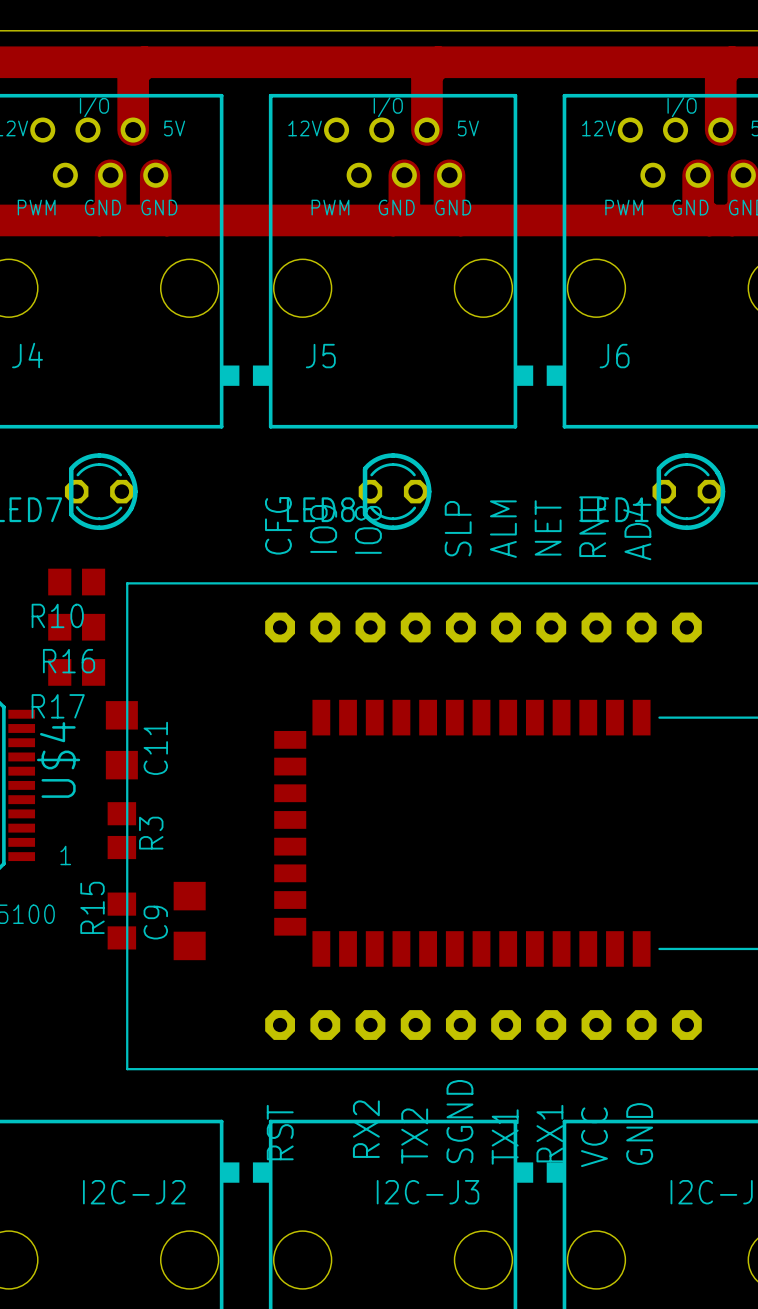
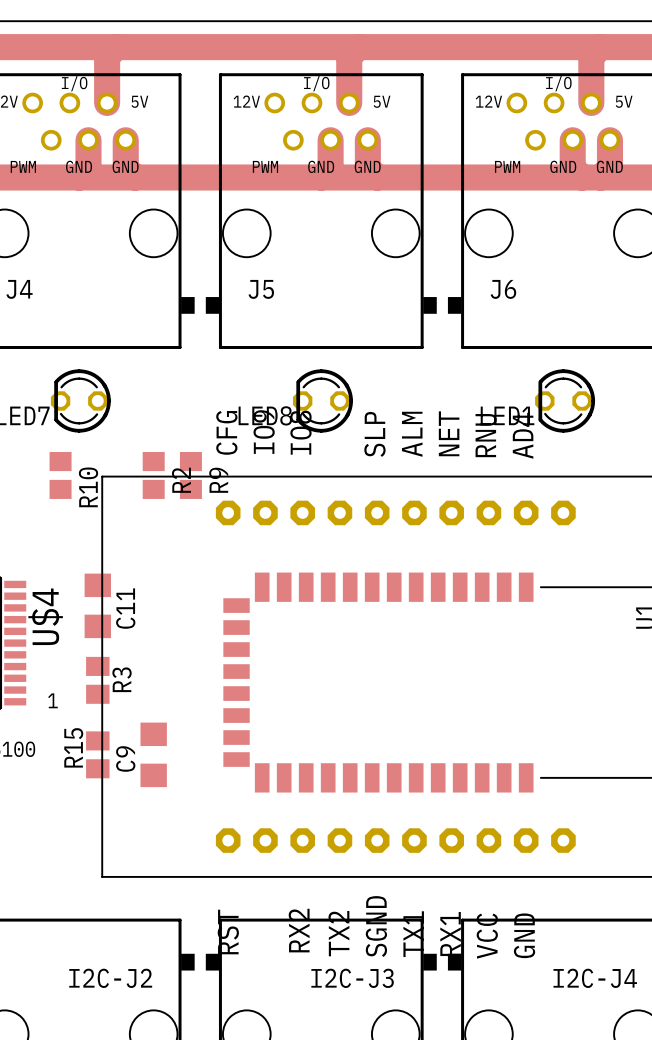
R10 rotation: 0° (76, 582) -> 90° clockwise (60, 475)
R2: none -> (153, 475)
R9: none -> (190, 475)
R10 name position: R10 (57, 615) -> R10 (88, 487)
R16: (76, 627) -> none
R17: (76, 672) -> none

